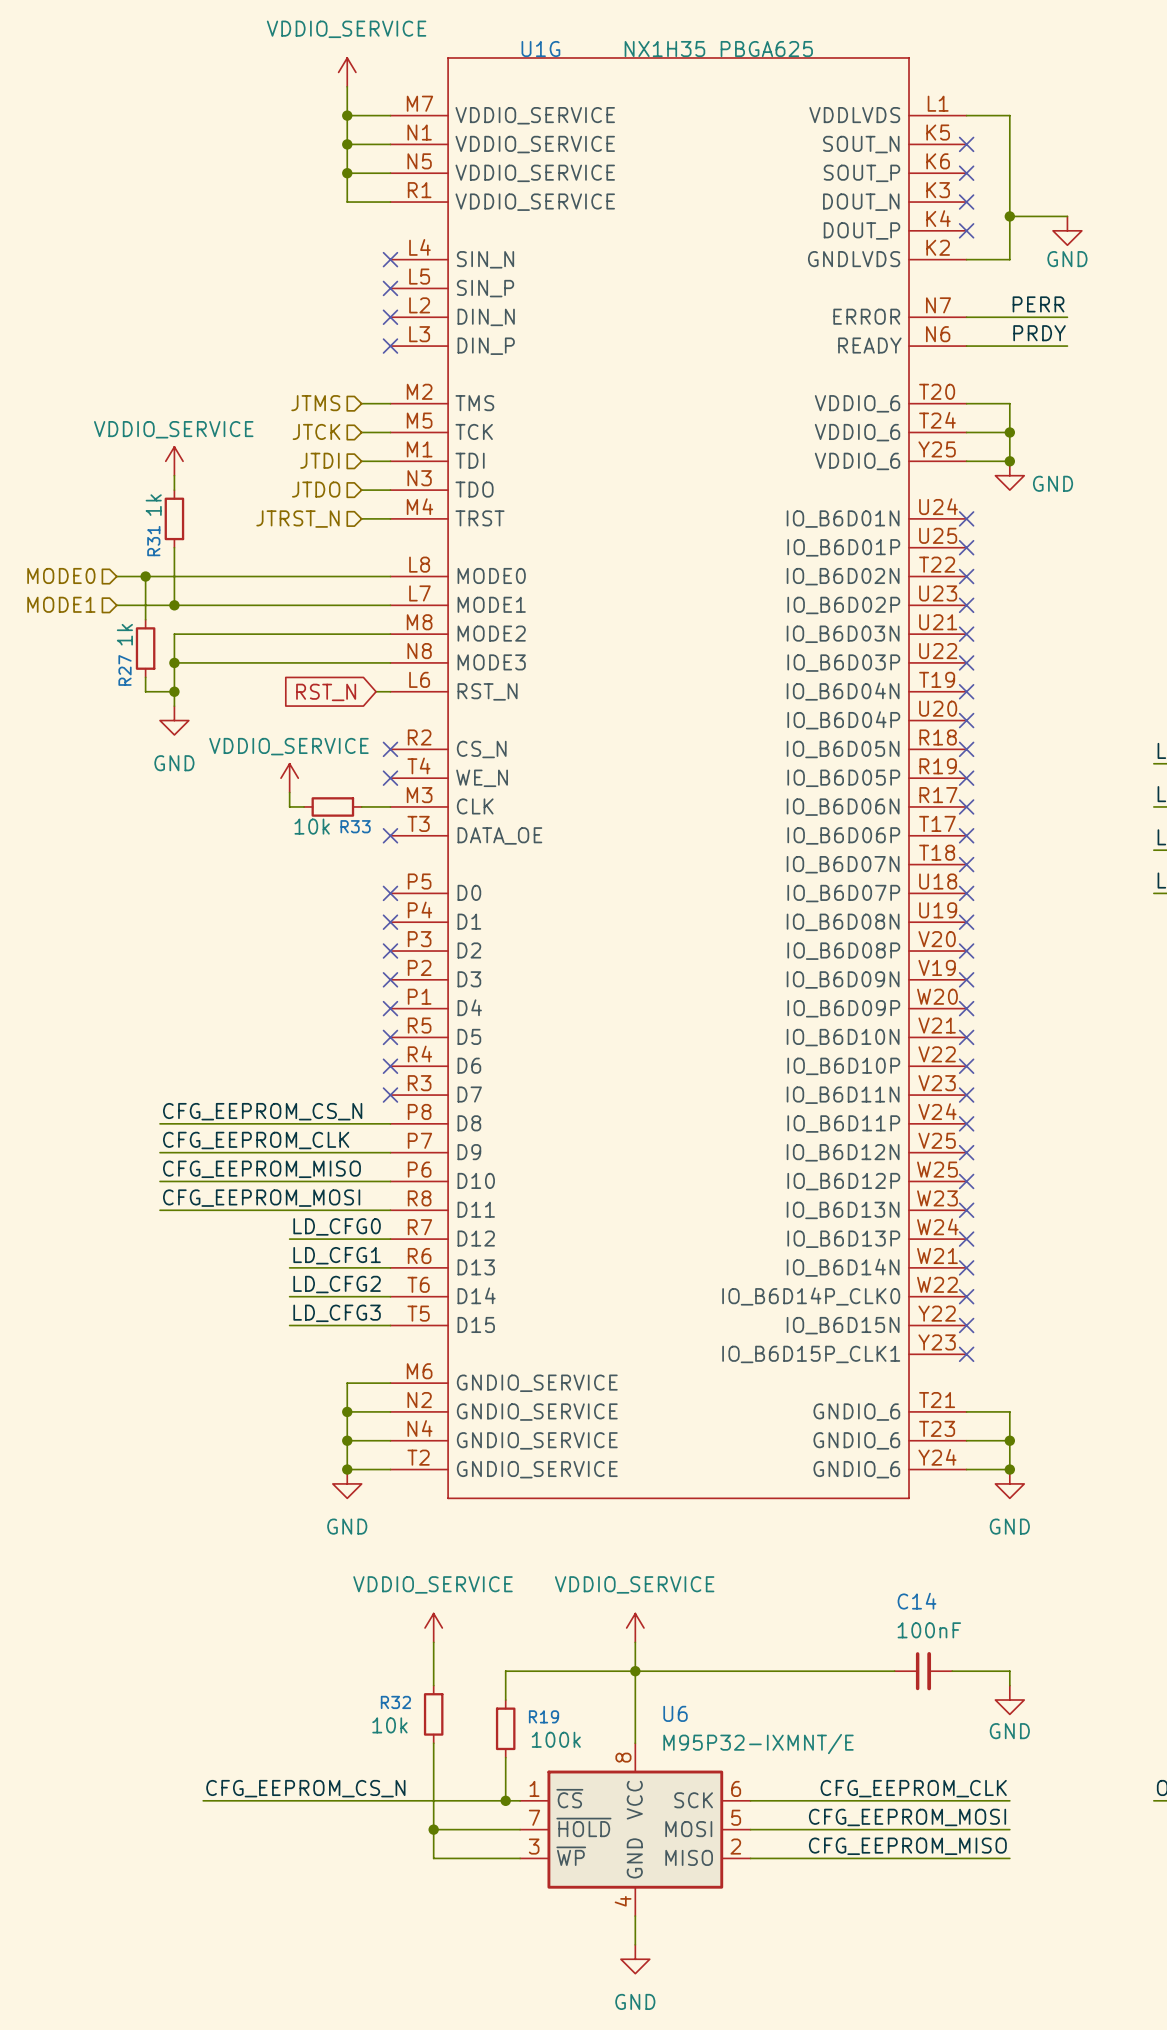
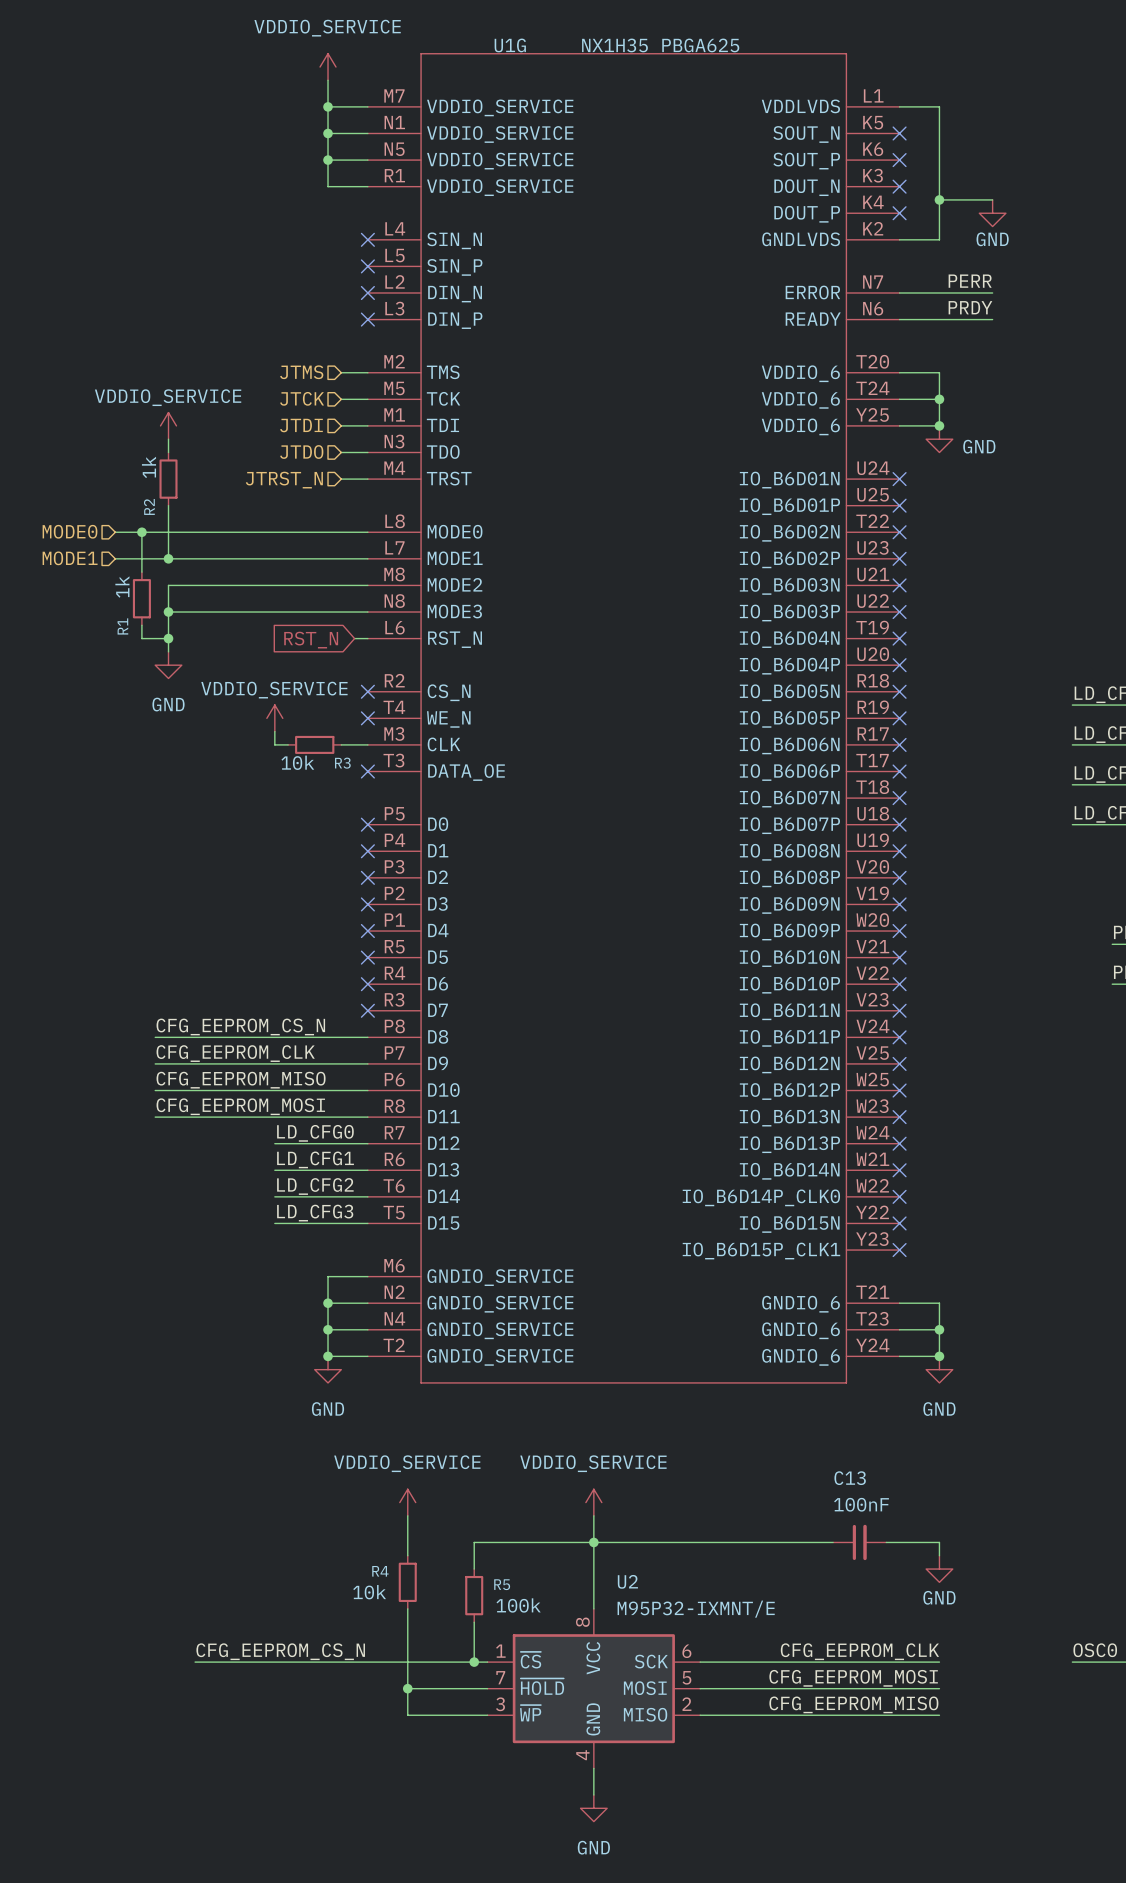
R31 name: R31 (153, 541) -> R2 (149, 506)
R27 name: R27 (125, 670) -> R1 (122, 626)
R33 name: R33 (355, 826) -> R3 (342, 763)
C14 name: C14 (916, 1601) -> C13 (850, 1478)
R32 name: R32 (395, 1702) -> R4 (380, 1571)
U6 name: U6 (675, 1713) -> U2 (627, 1581)
R19 name: R19 (544, 1716) -> R5 (502, 1584)

